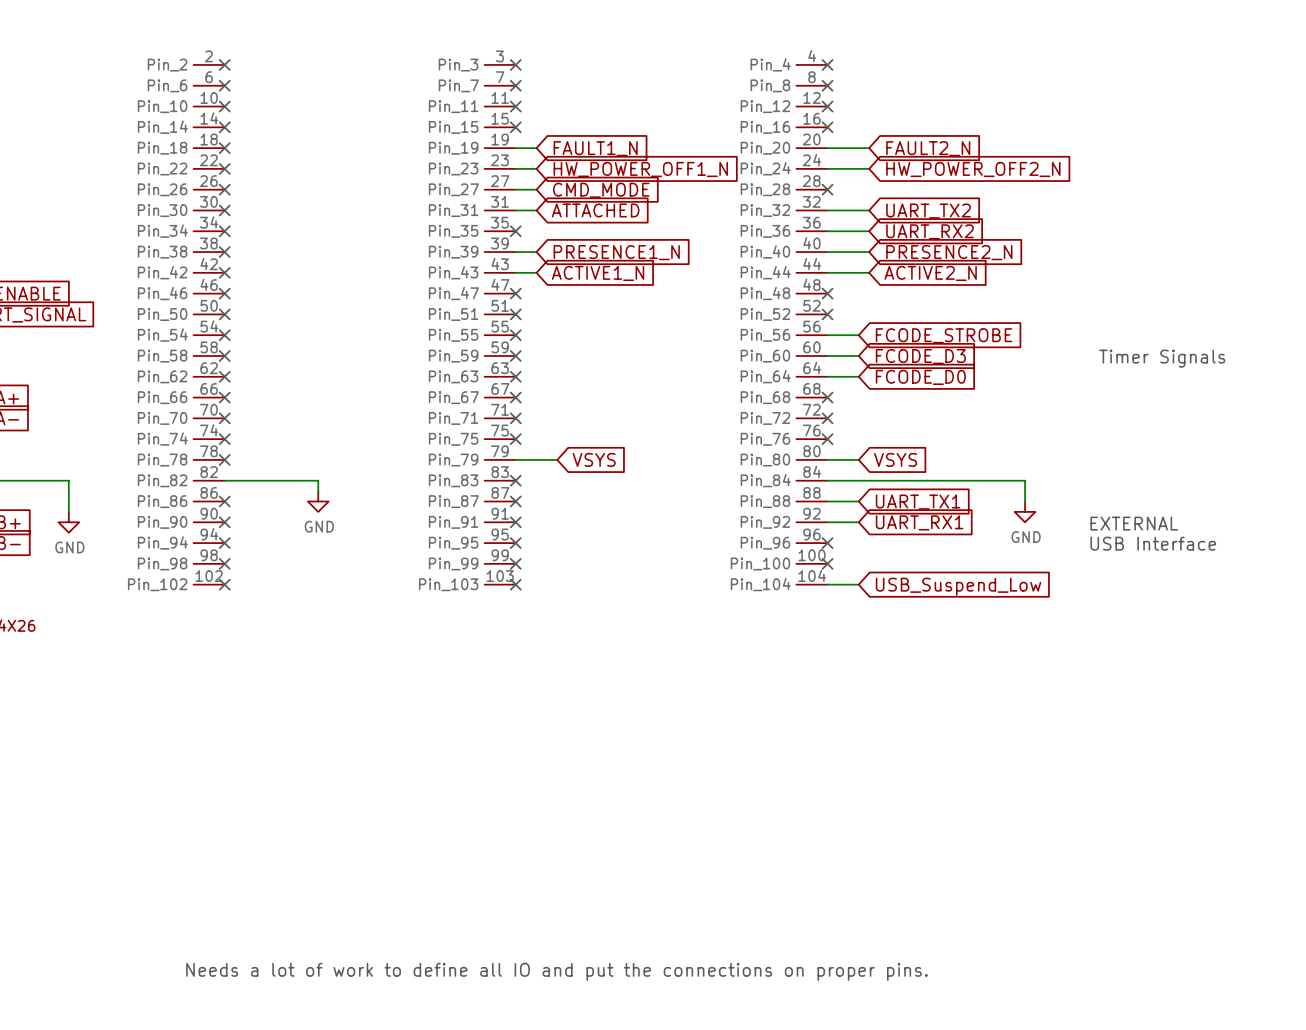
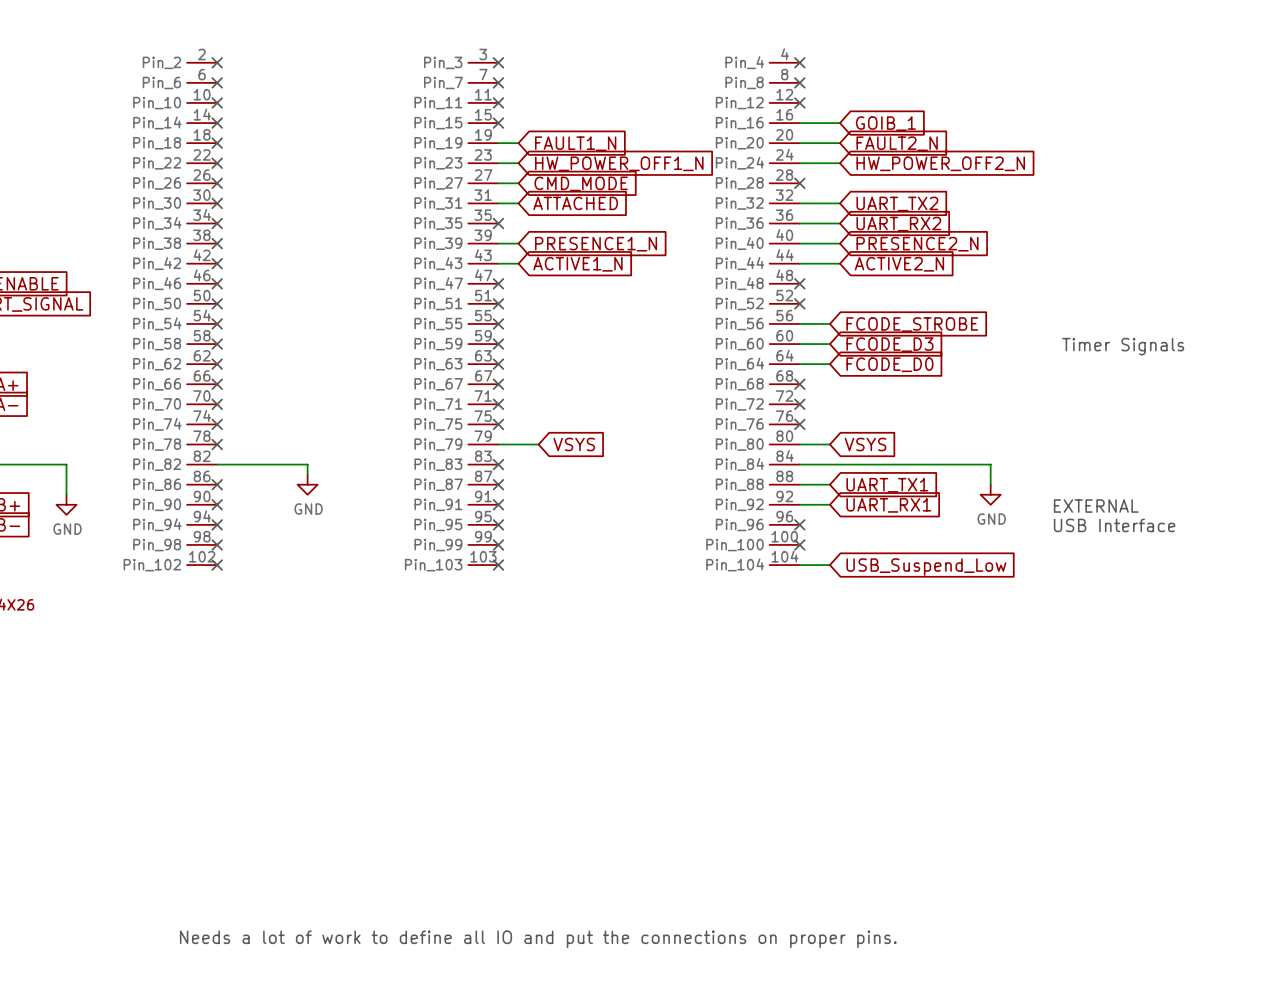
wire: none -> (799, 123) (840, 123)
no-connect mark: (827, 127) -> none
global label: none -> GOIB_1 (885, 123)

